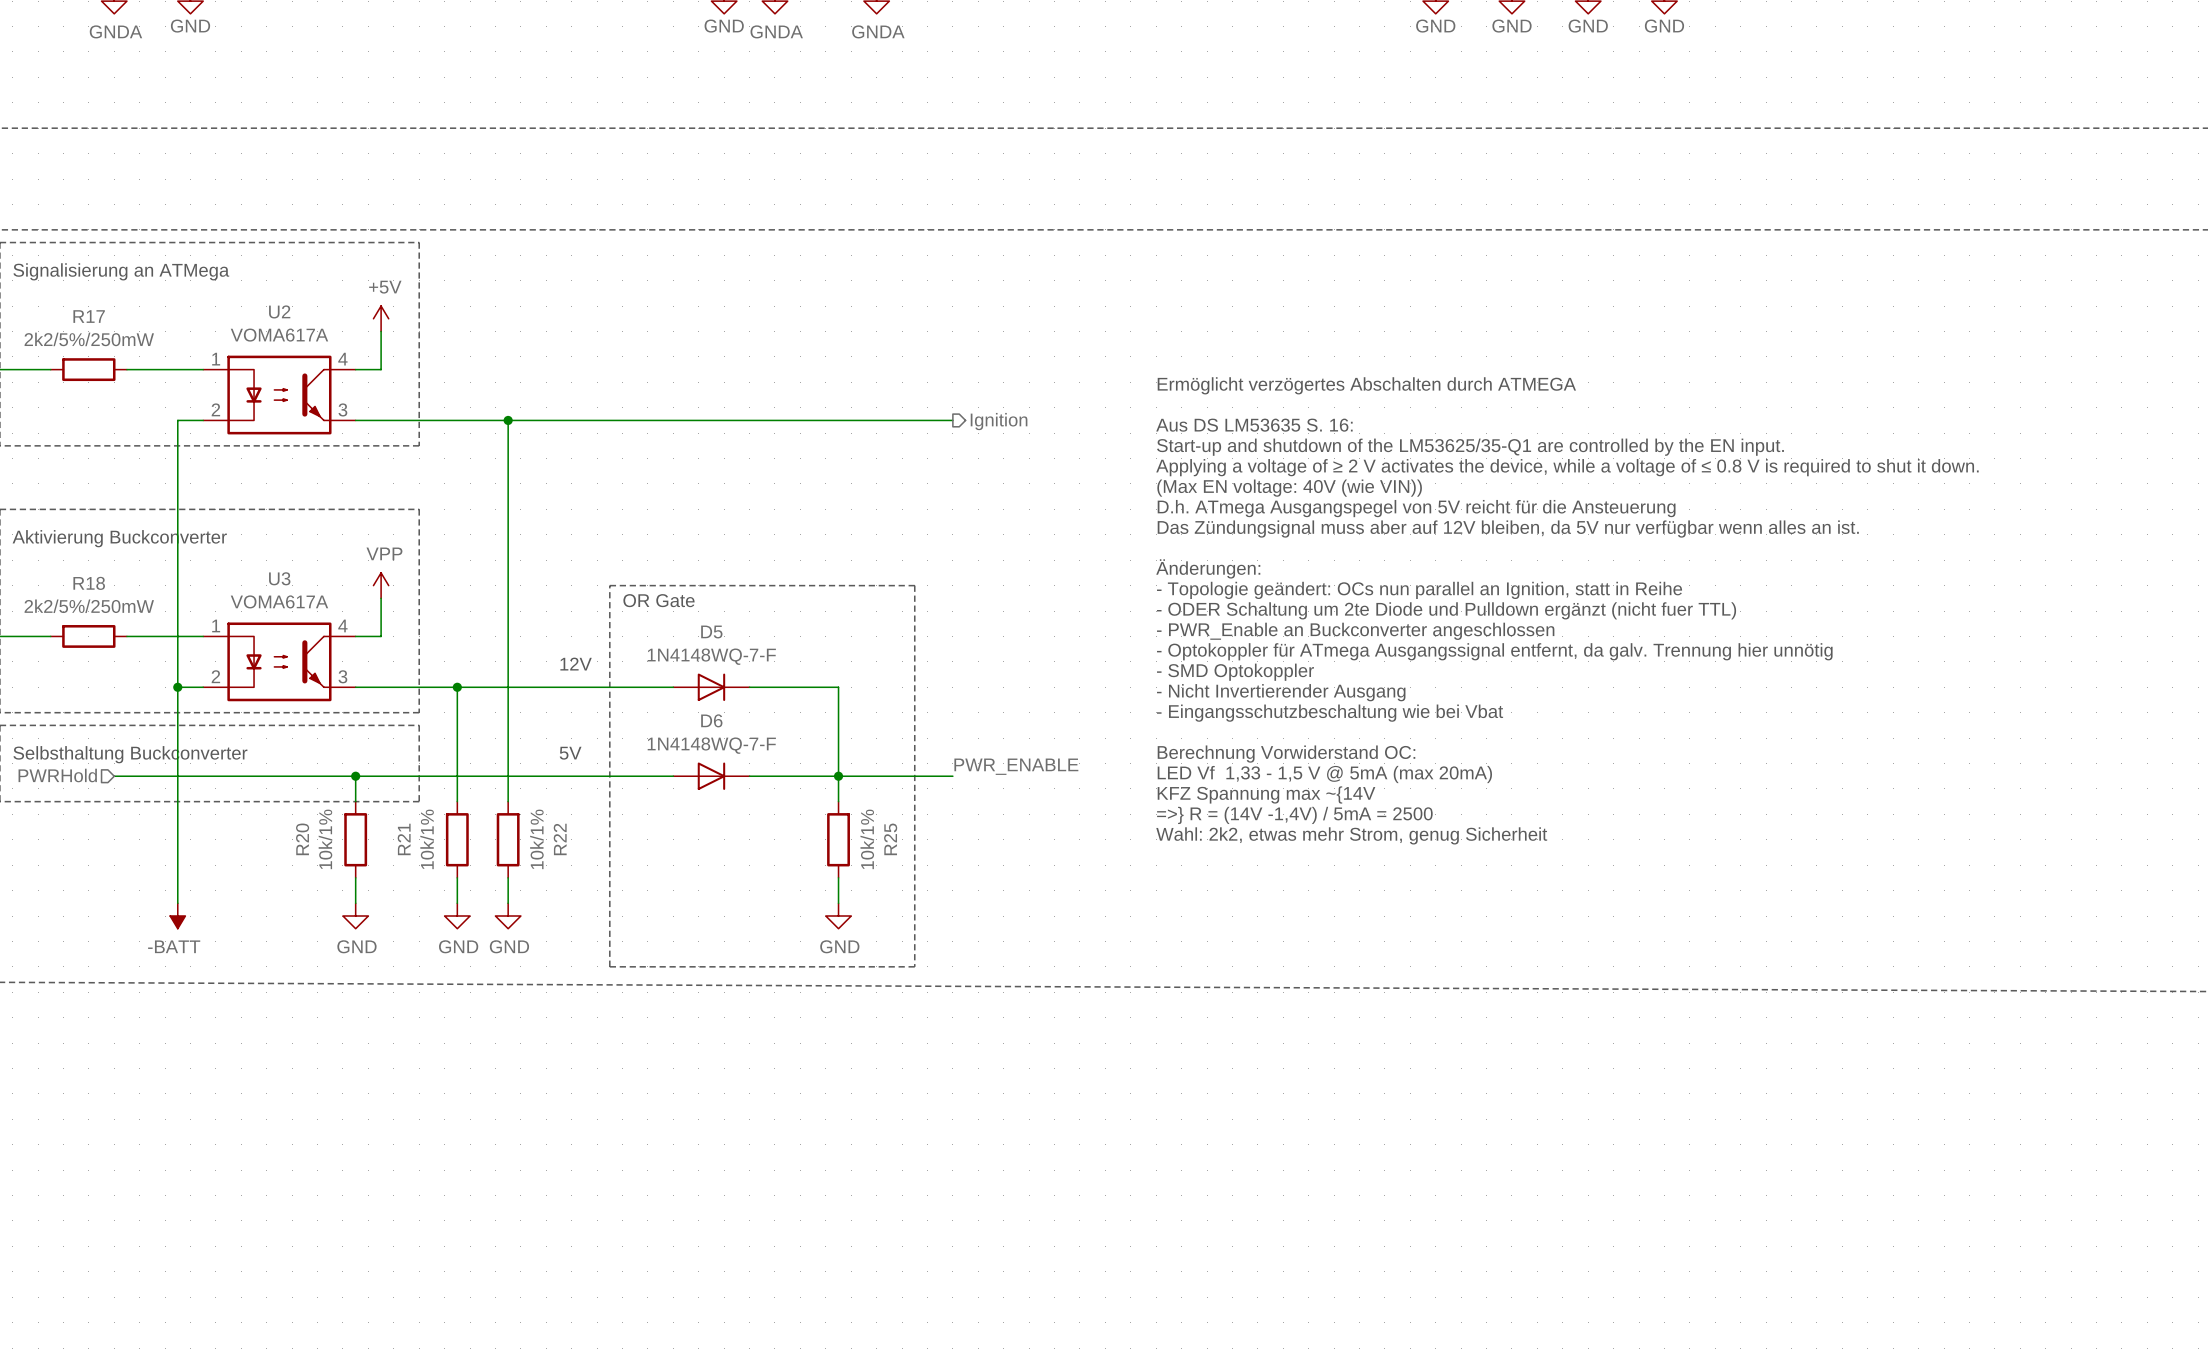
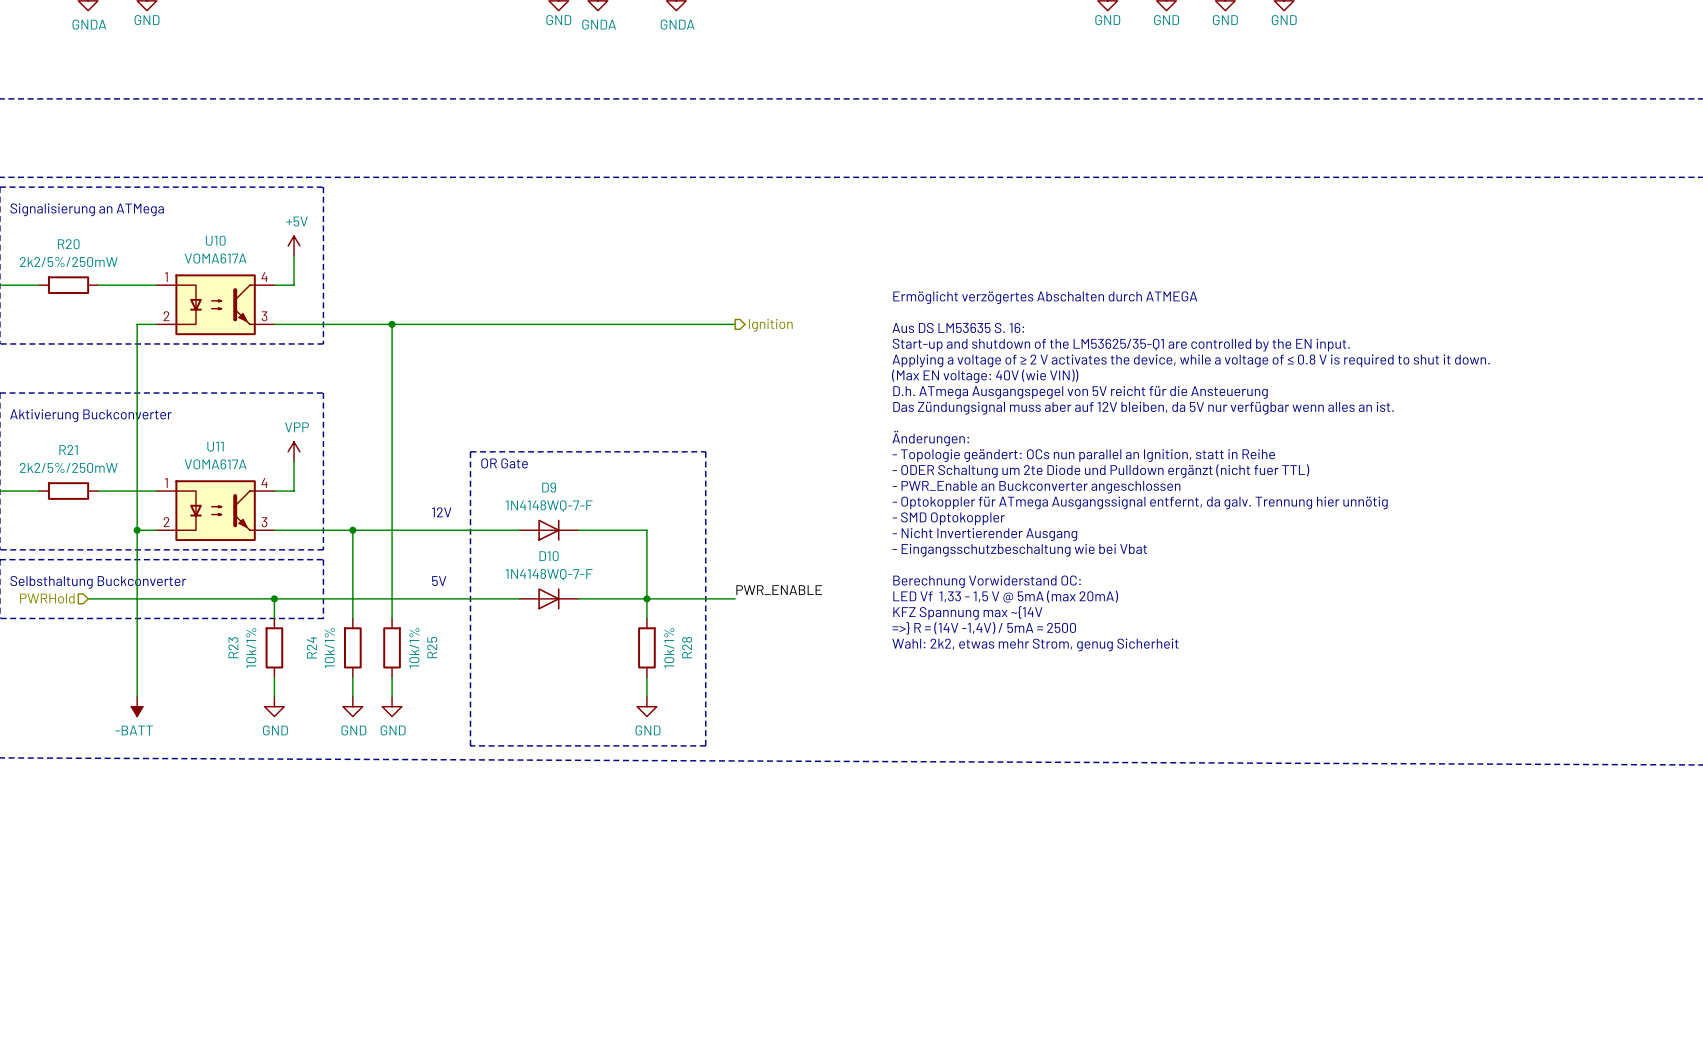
U2 name: U2 (279, 311) -> U10 (215, 240)
R17 name: R17 (89, 316) -> R20 (68, 244)
U3 name: U3 (279, 578) -> U11 (215, 446)
R18 name: R18 (89, 583) -> R21 (68, 450)
D5 name: D5 (711, 632) -> D9 (549, 487)
D6 name: D6 (711, 720) -> D10 (549, 556)
R20 name: R20 (302, 839) -> R23 (233, 647)
R21 name: R21 (404, 839) -> R24 (311, 647)
R22 name: R22 (560, 839) -> R25 (432, 647)
R25 name: R25 (890, 839) -> R28 (687, 647)

